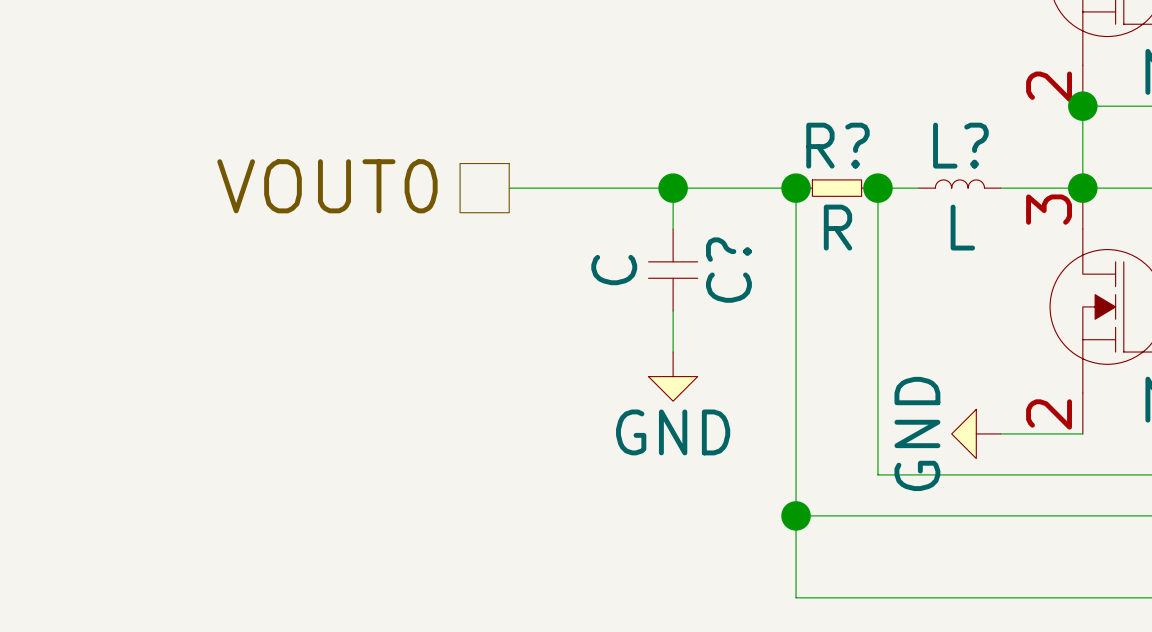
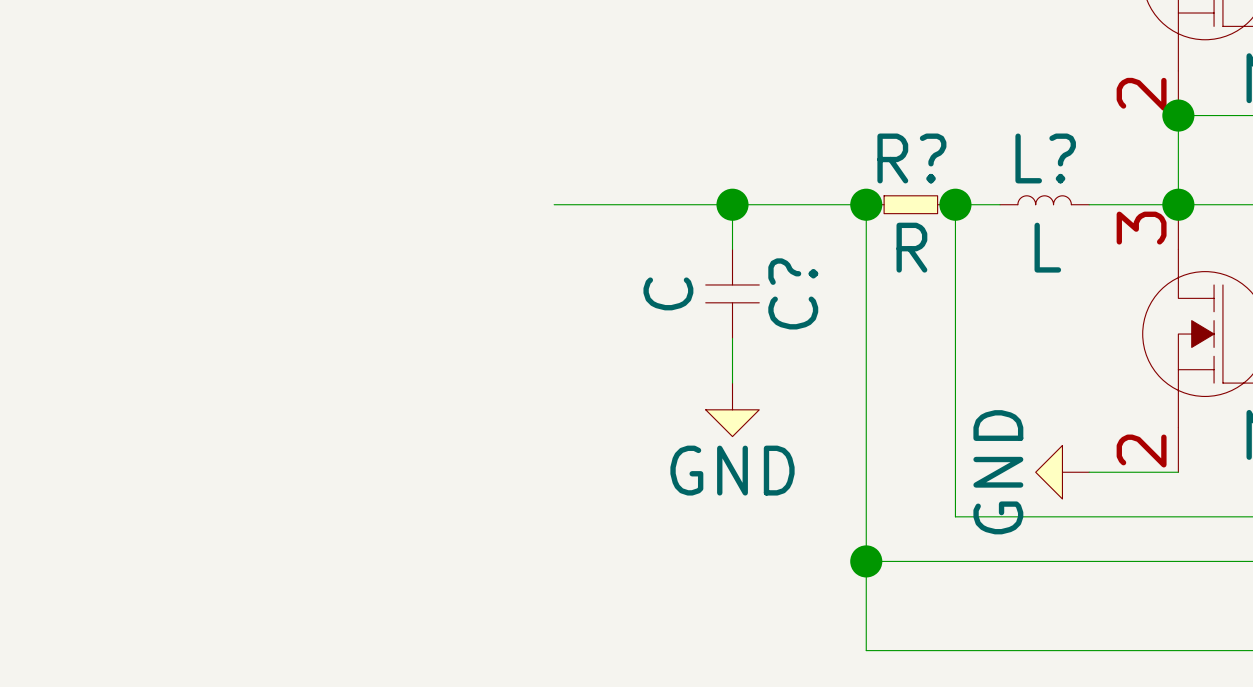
hierarchical label: VOUT0 (327, 186) -> none

